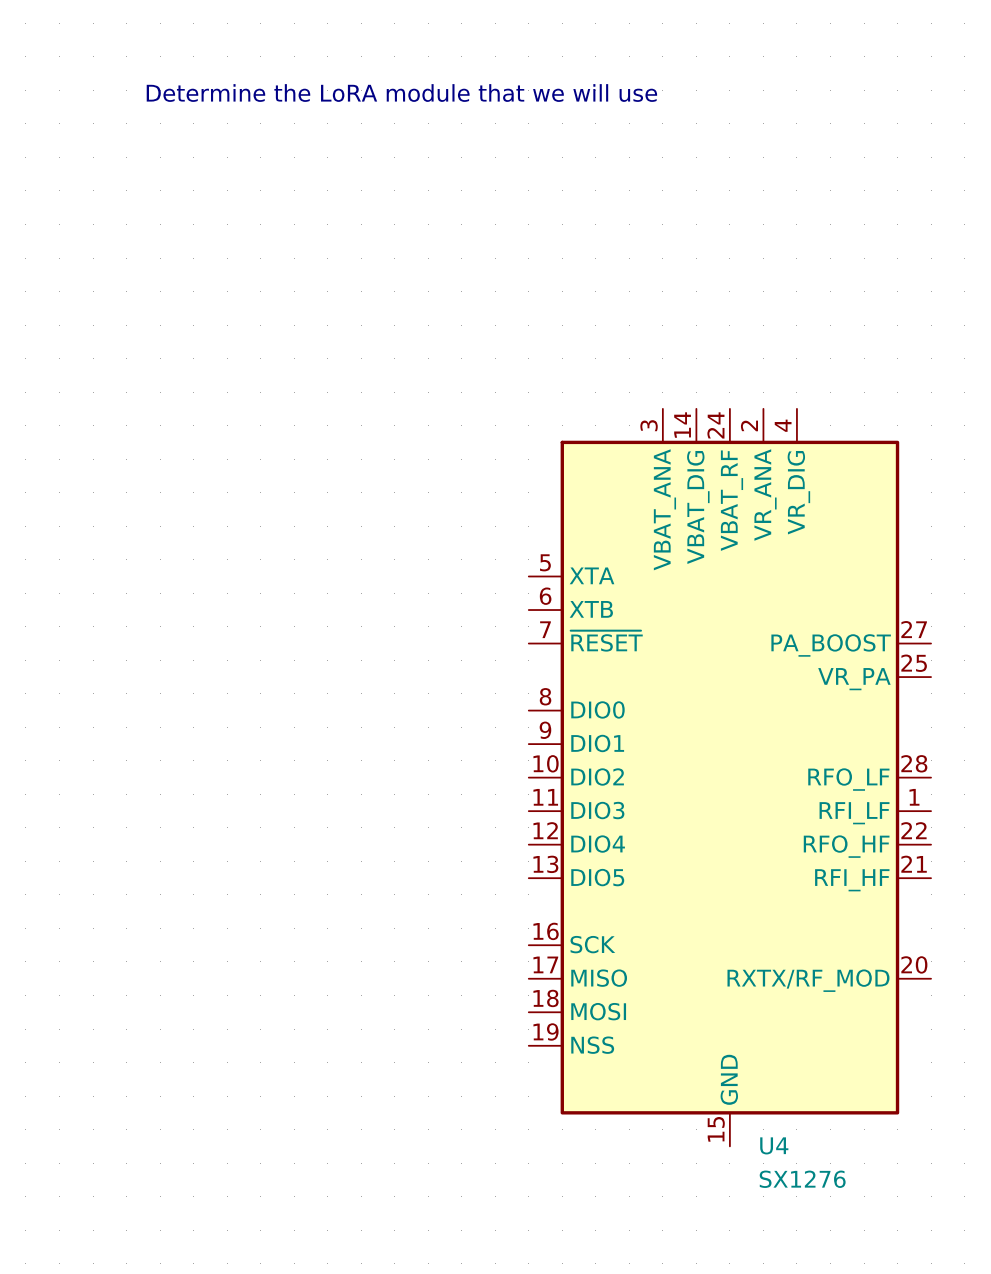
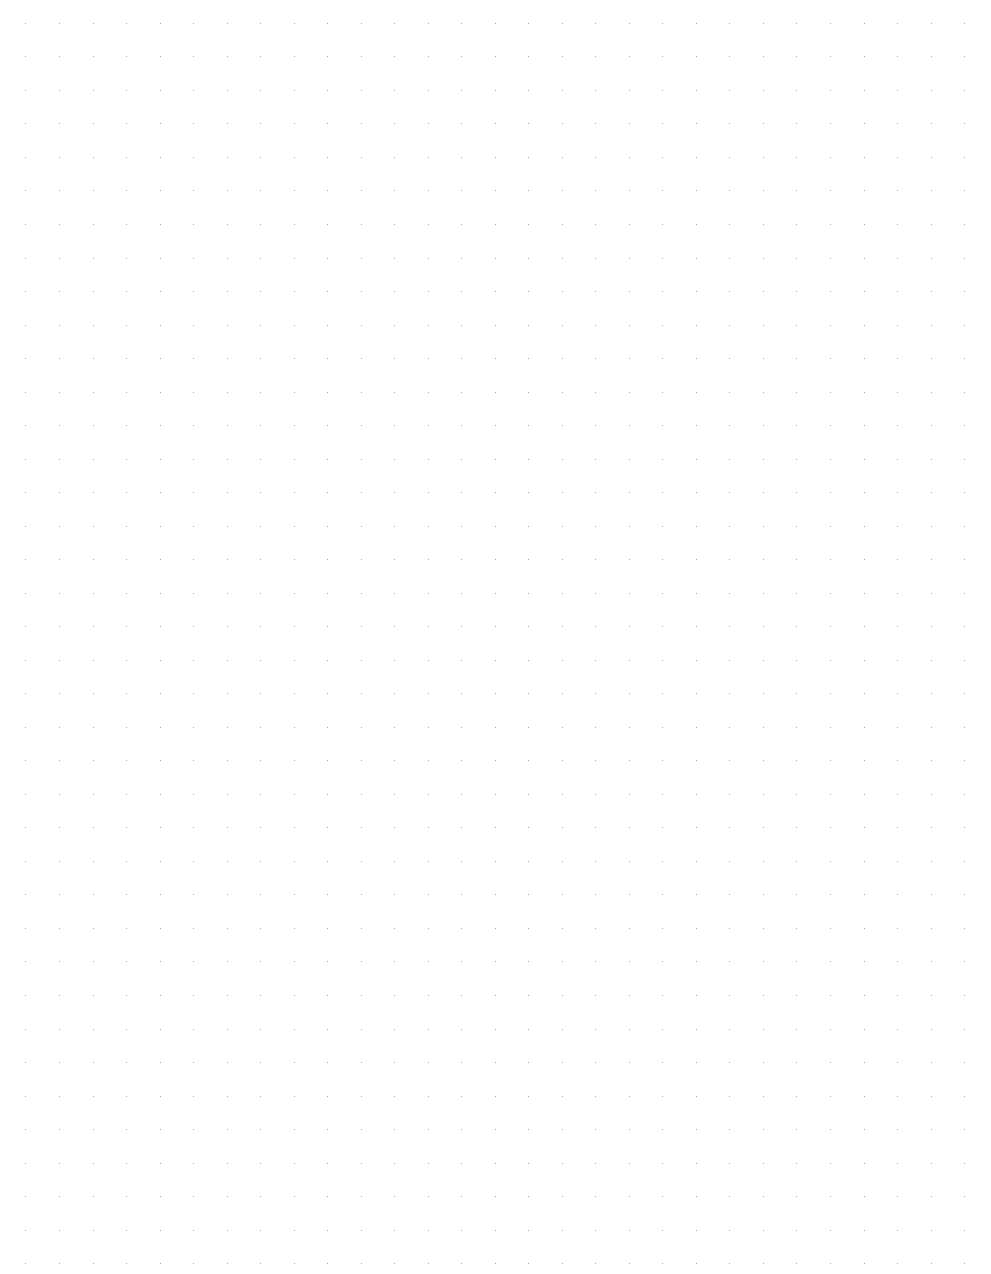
text: Determine the LoRA module that we will use (401, 93) -> none
U4: SX1276 (729, 777) -> none

